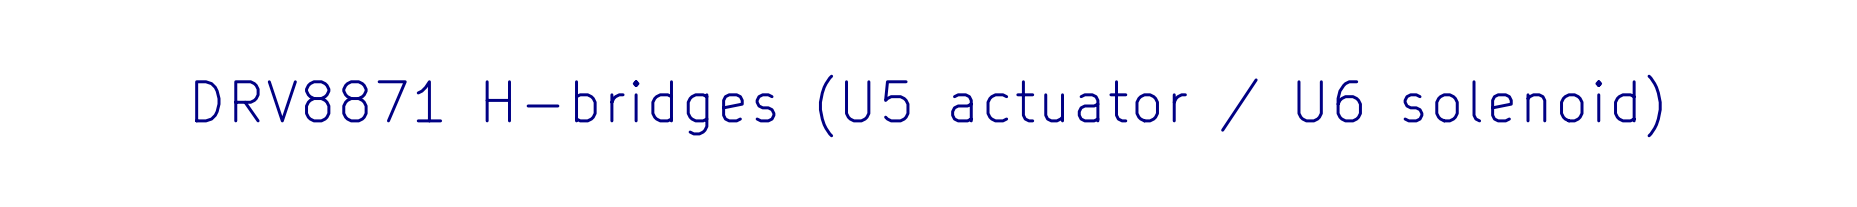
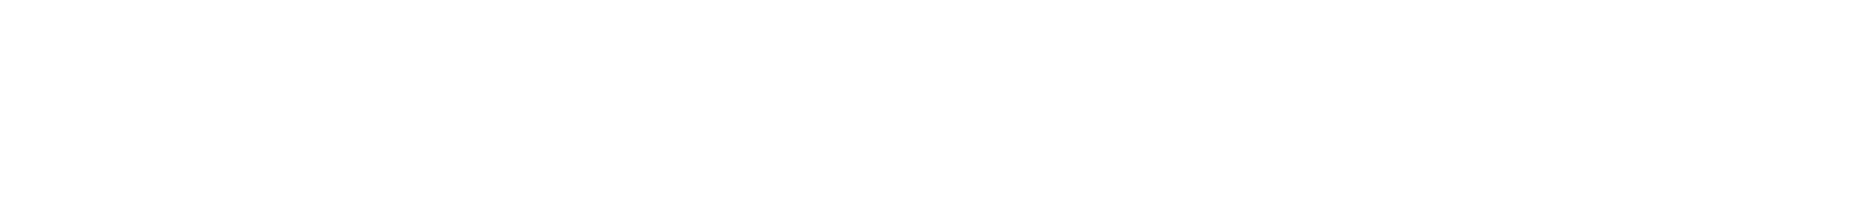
text: DRV8871 H-bridges (U5 actuator / U6 solenoid) (928, 105) -> none

